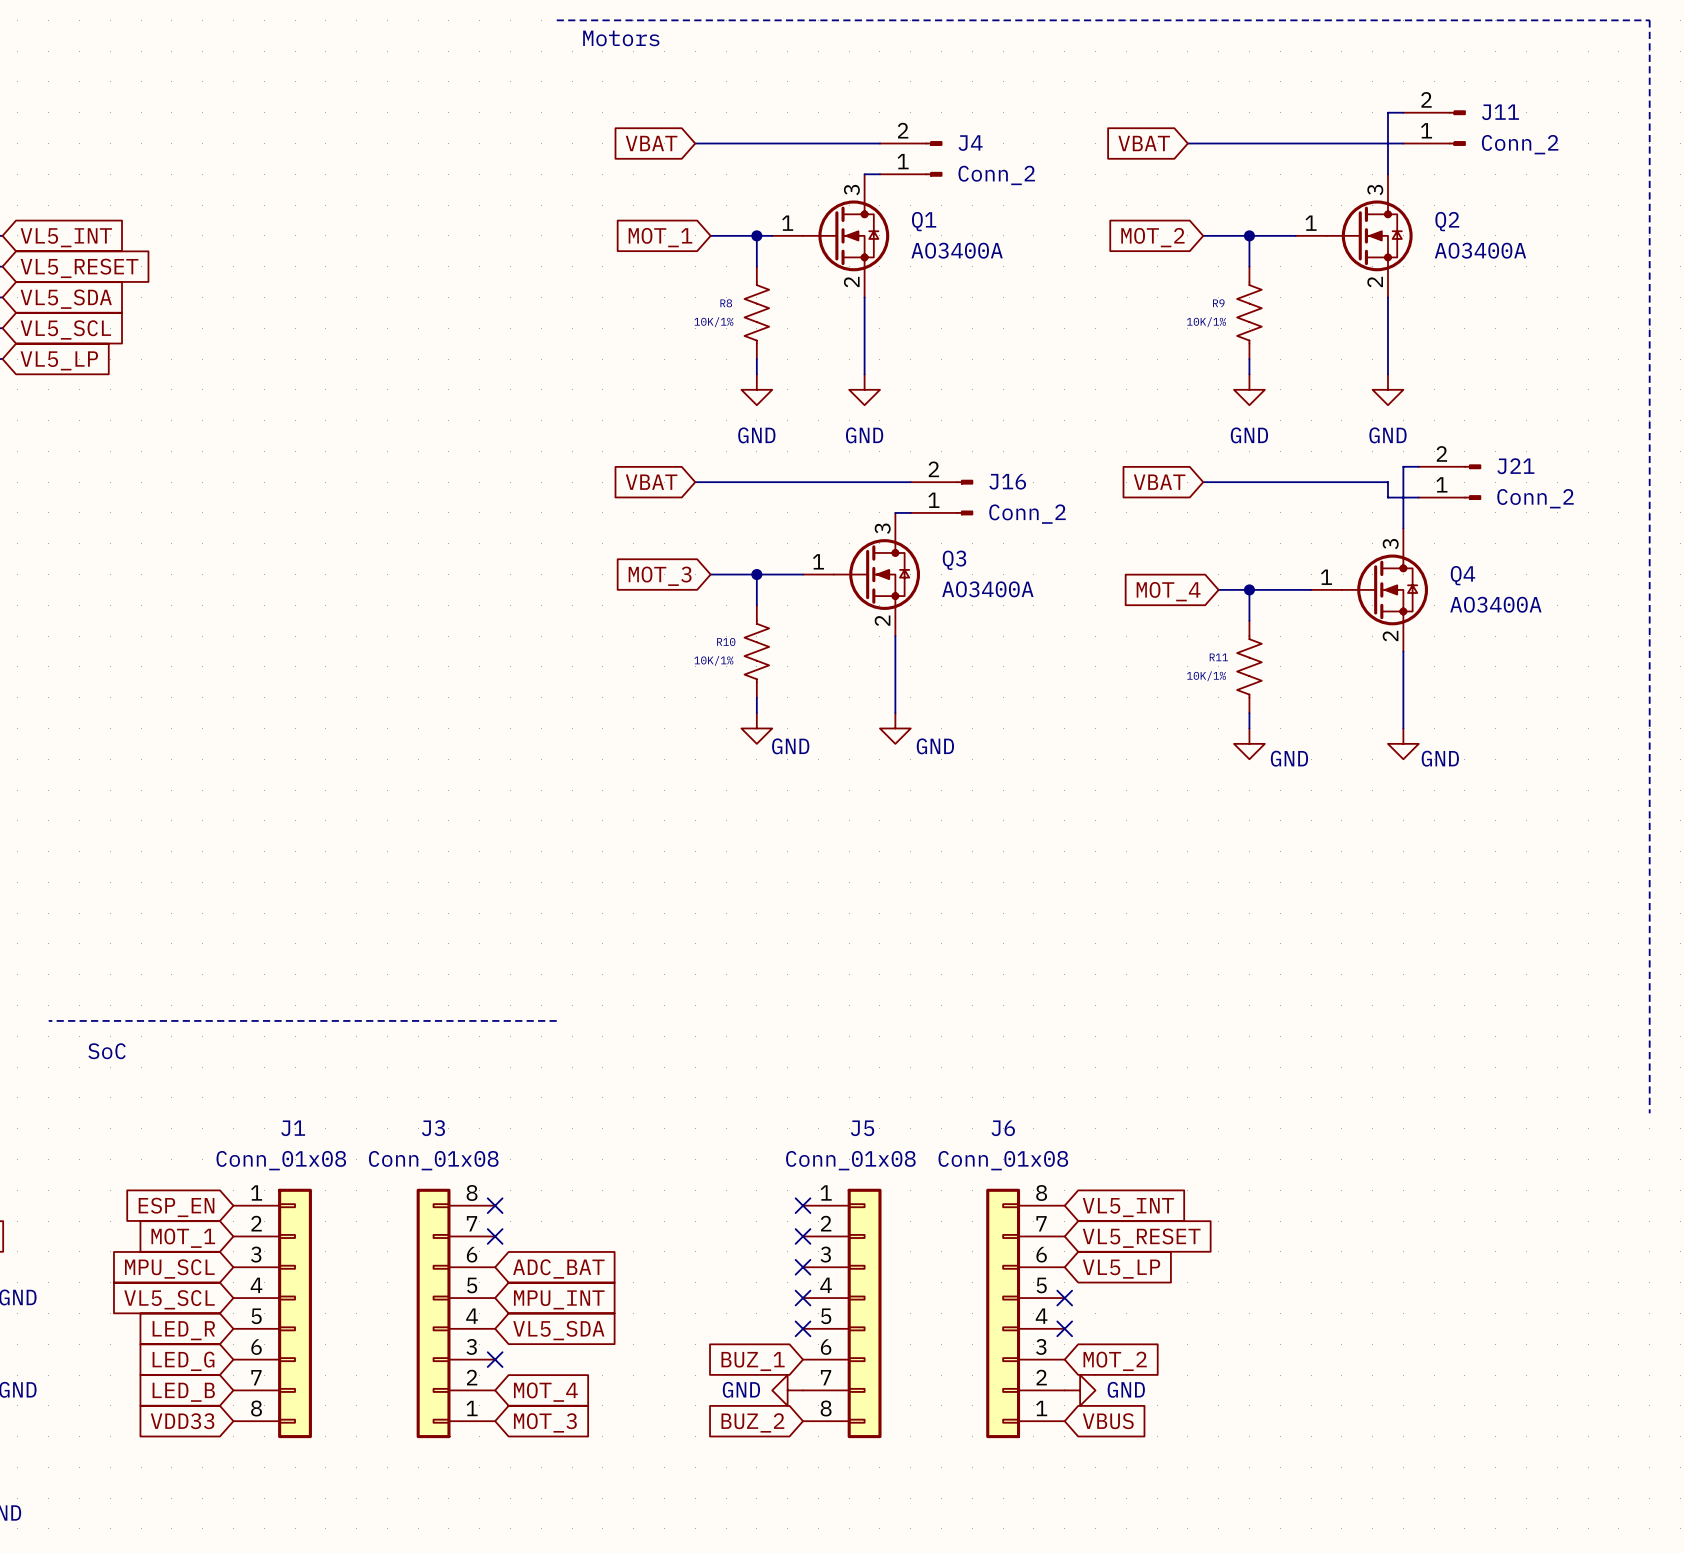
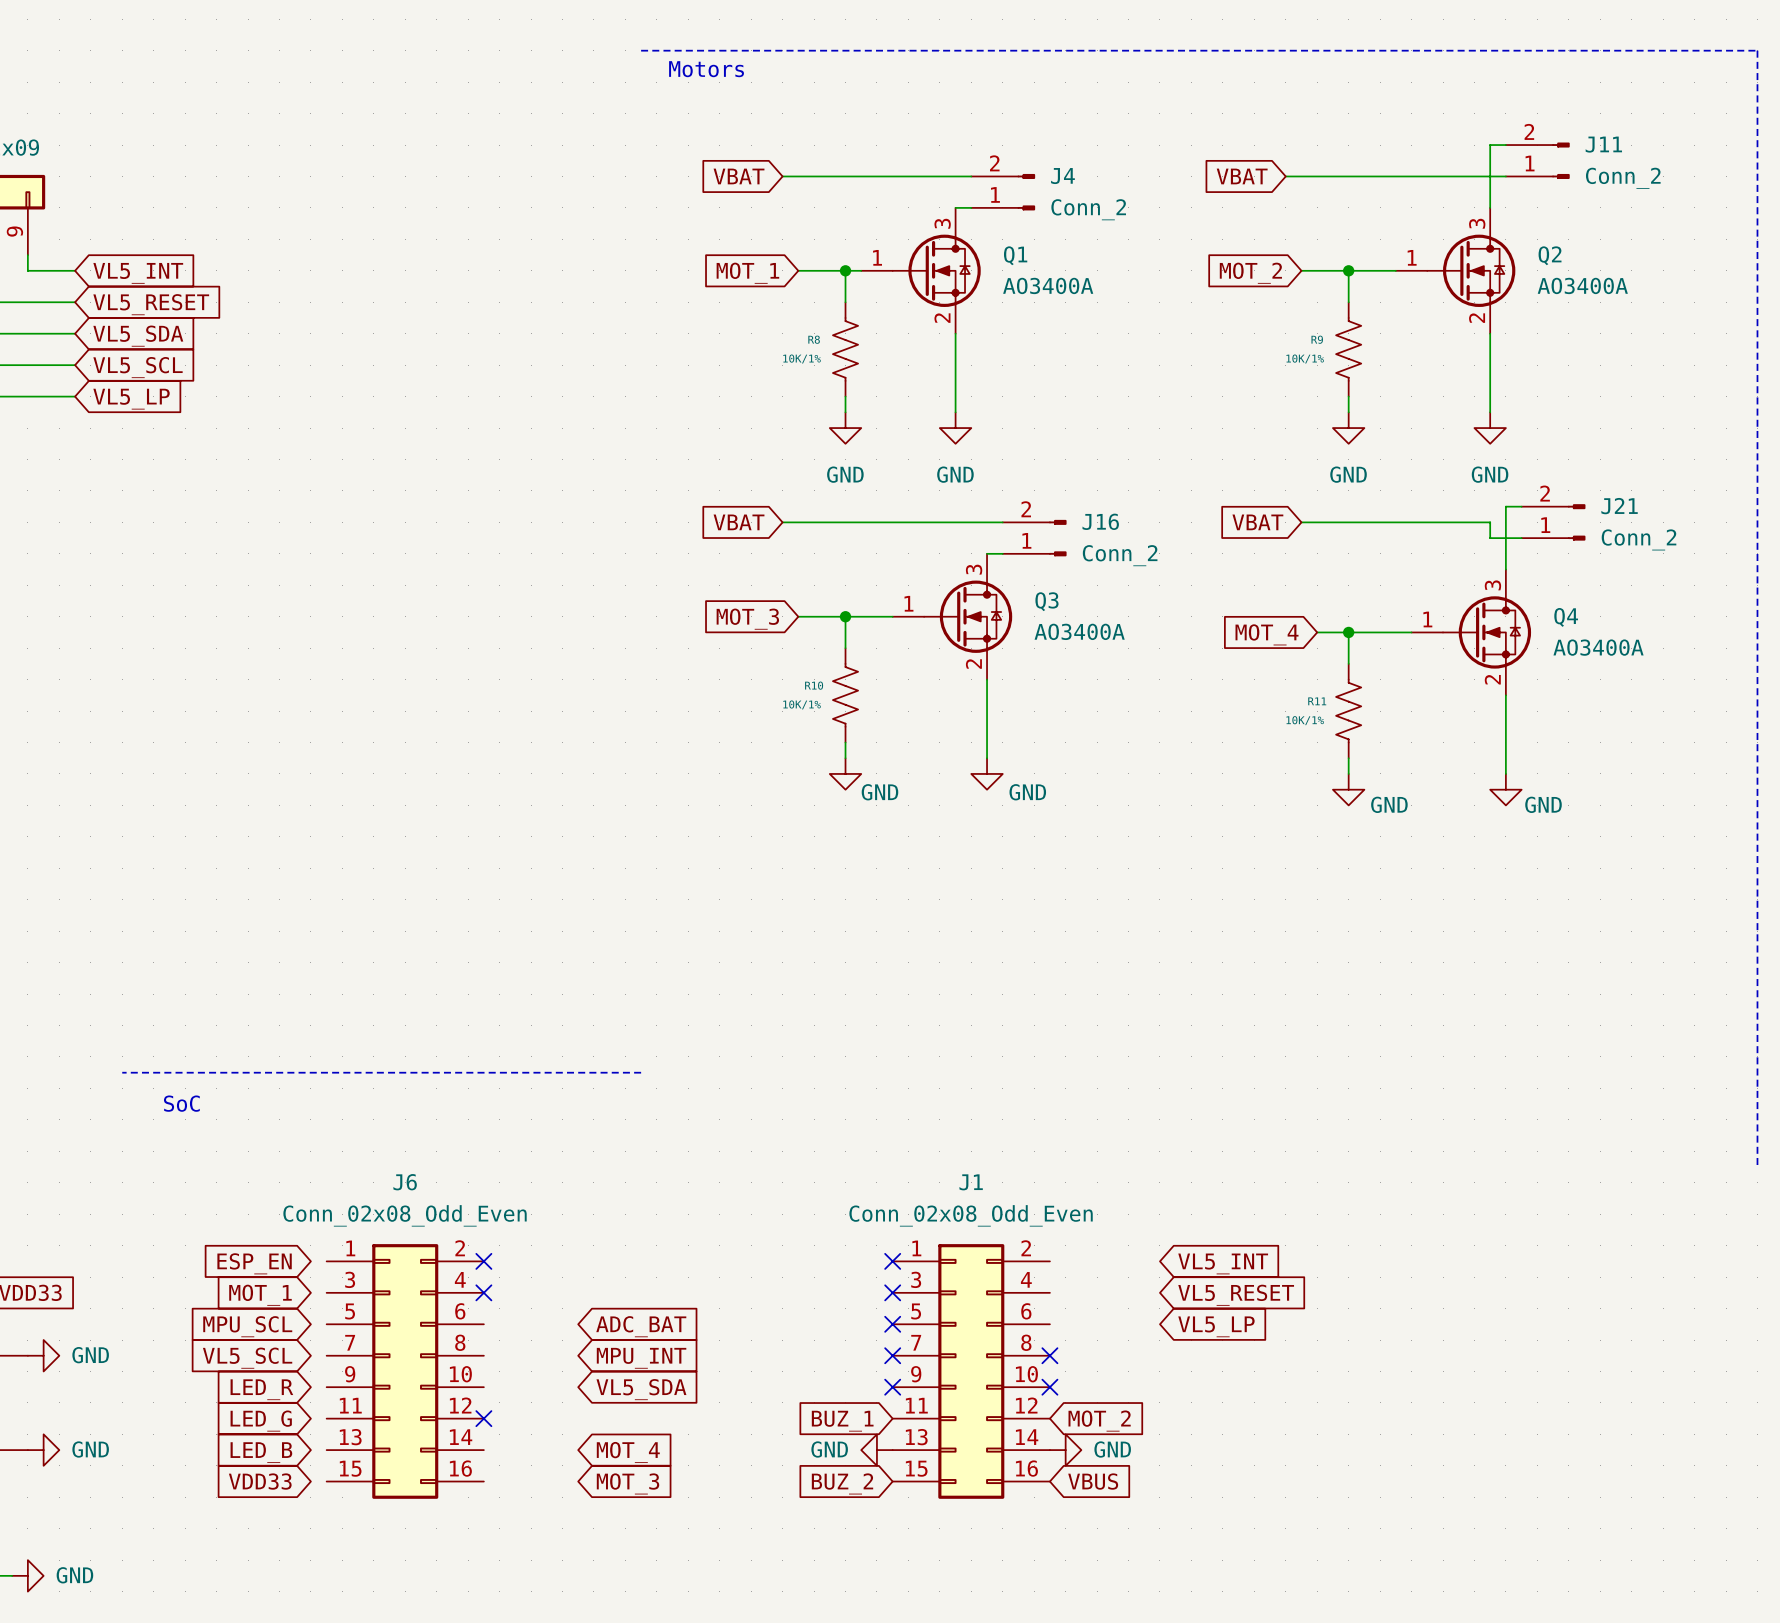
J1 name position: J1 (293, 1128) -> J1 (971, 1182)
J1 value: Conn_01x08 (281, 1160) -> Conn_02x08_Odd_Even (971, 1215)
J6 value: Conn_01x08 (1003, 1160) -> Conn_02x08_Odd_Even (405, 1215)
J1 symbol: [233, 1188, 312, 1439] -> [892, 1244, 1050, 1499]
J6 symbol: [986, 1188, 1065, 1439] -> [326, 1244, 484, 1499]
no-connect mark: none -> (483, 1261)
no-connect mark: (495, 1205) -> none
no-connect mark: none -> (483, 1292)
no-connect mark: (495, 1236) -> none
no-connect mark: none -> (1049, 1355)
no-connect mark: (1064, 1298) -> none
J3: Conn_01x08 (455, 1313) -> none
J5: Conn_01x08 (842, 1313) -> none
no-connect mark: none -> (1049, 1387)
no-connect mark: (1064, 1328) -> none
no-connect mark: none -> (483, 1418)
no-connect mark: (495, 1359) -> none
global label position: MOT_2 (1115, 1361) -> MOT_2 (1099, 1421)
power symbol position: GND (1080, 1390) -> GND (1065, 1450)
global label position: VBUS (1108, 1421) -> VBUS (1093, 1481)

